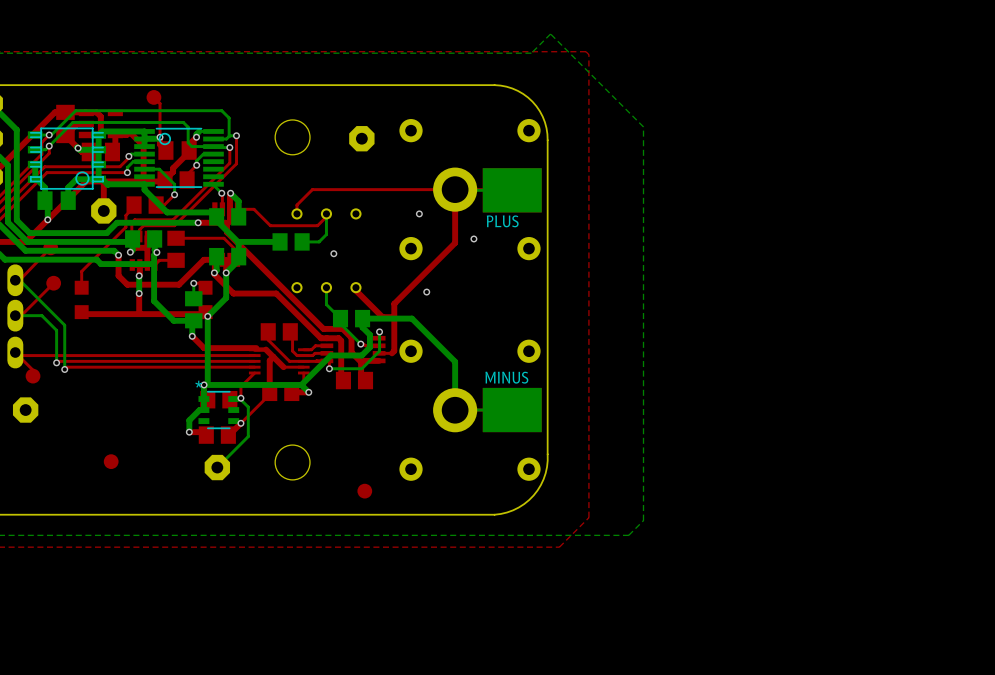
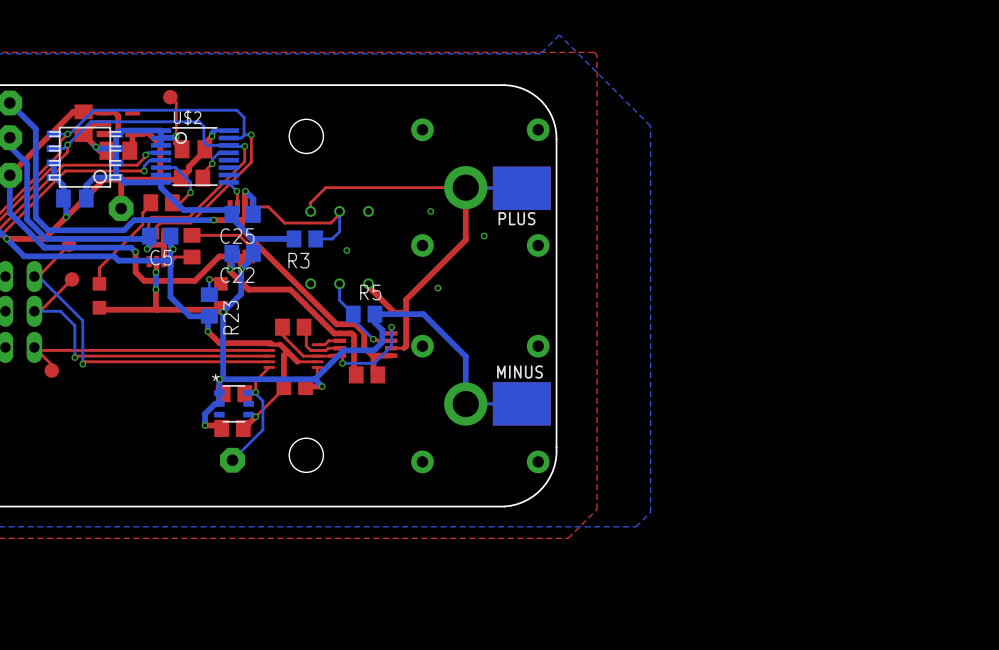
U$2 name: none -> U$2 (187, 117)
part: (361, 138) -> none
C25 name: none -> C25 (237, 236)
C5 name: none -> C5 (161, 257)
R3 name: none -> R3 (298, 260)
C22 name: none -> C22 (237, 275)
R5 name: none -> R5 (370, 292)
R23 name: none -> R23 (231, 317)
part: (25, 410) -> none
part: (111, 461) -> none
part: (364, 491) -> none

